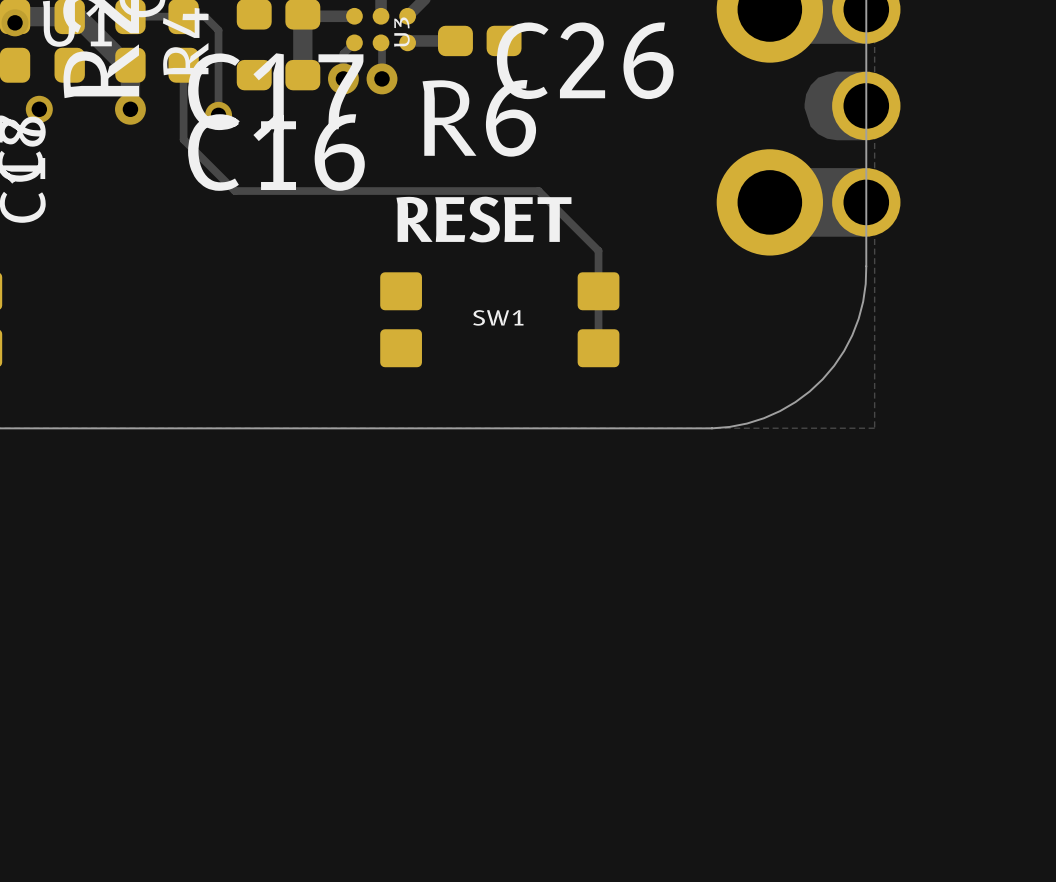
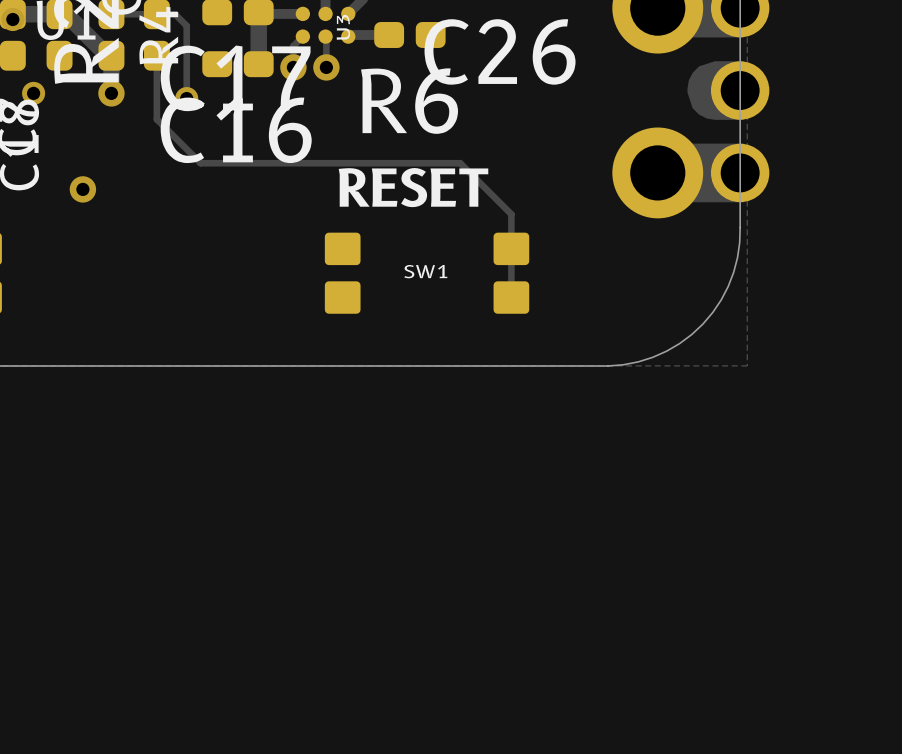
via: none -> (82, 189)

